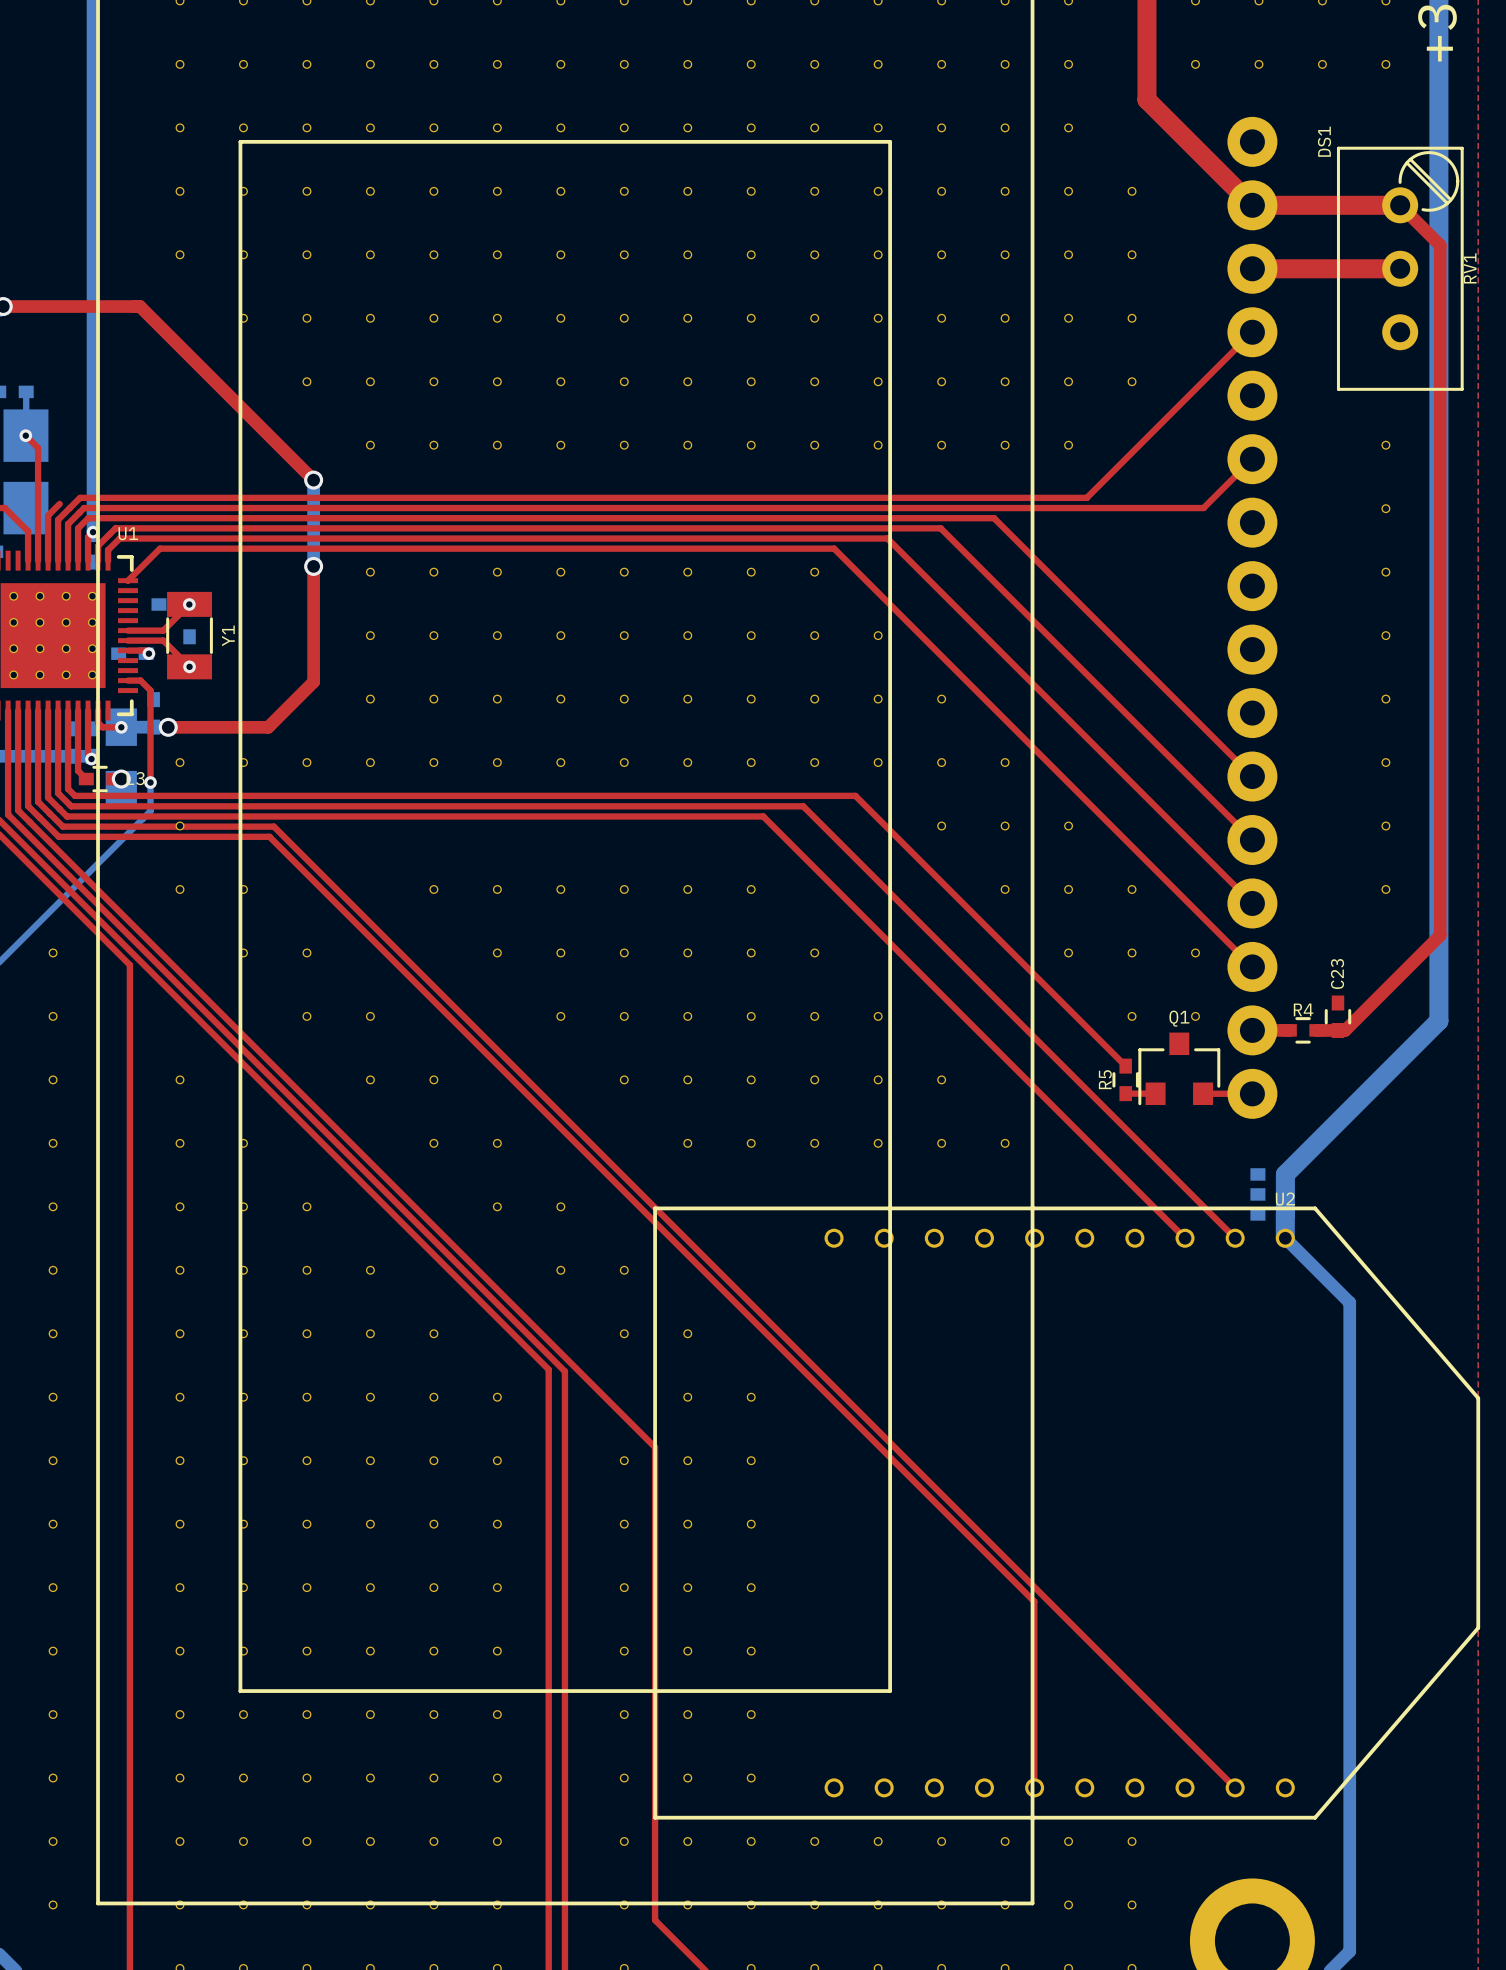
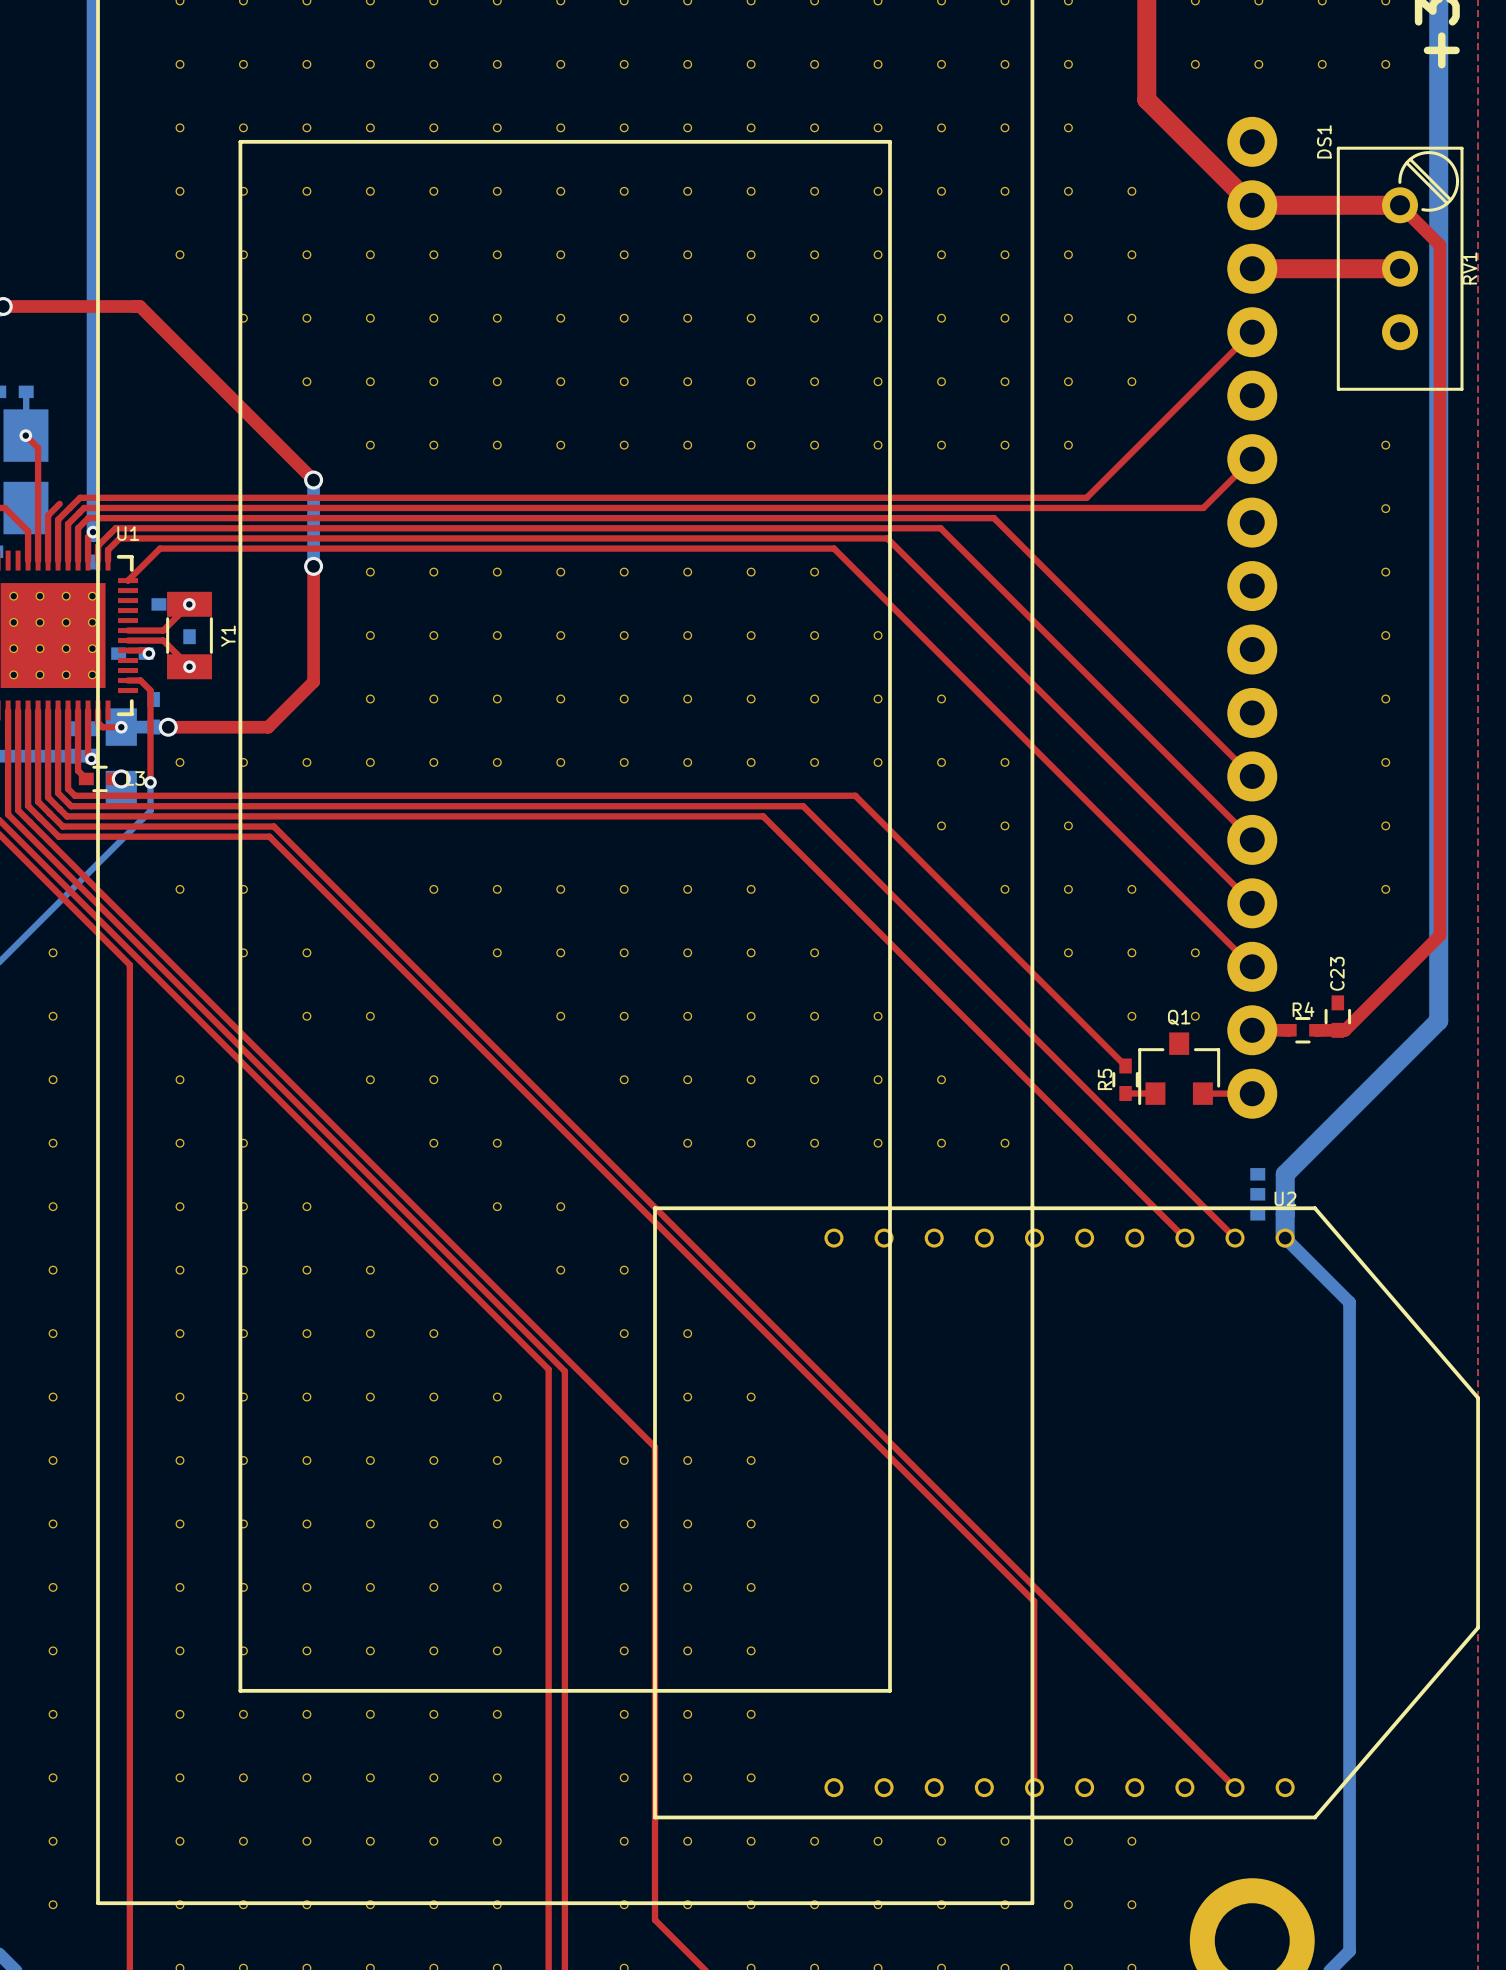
part: (180, 826) -> none

